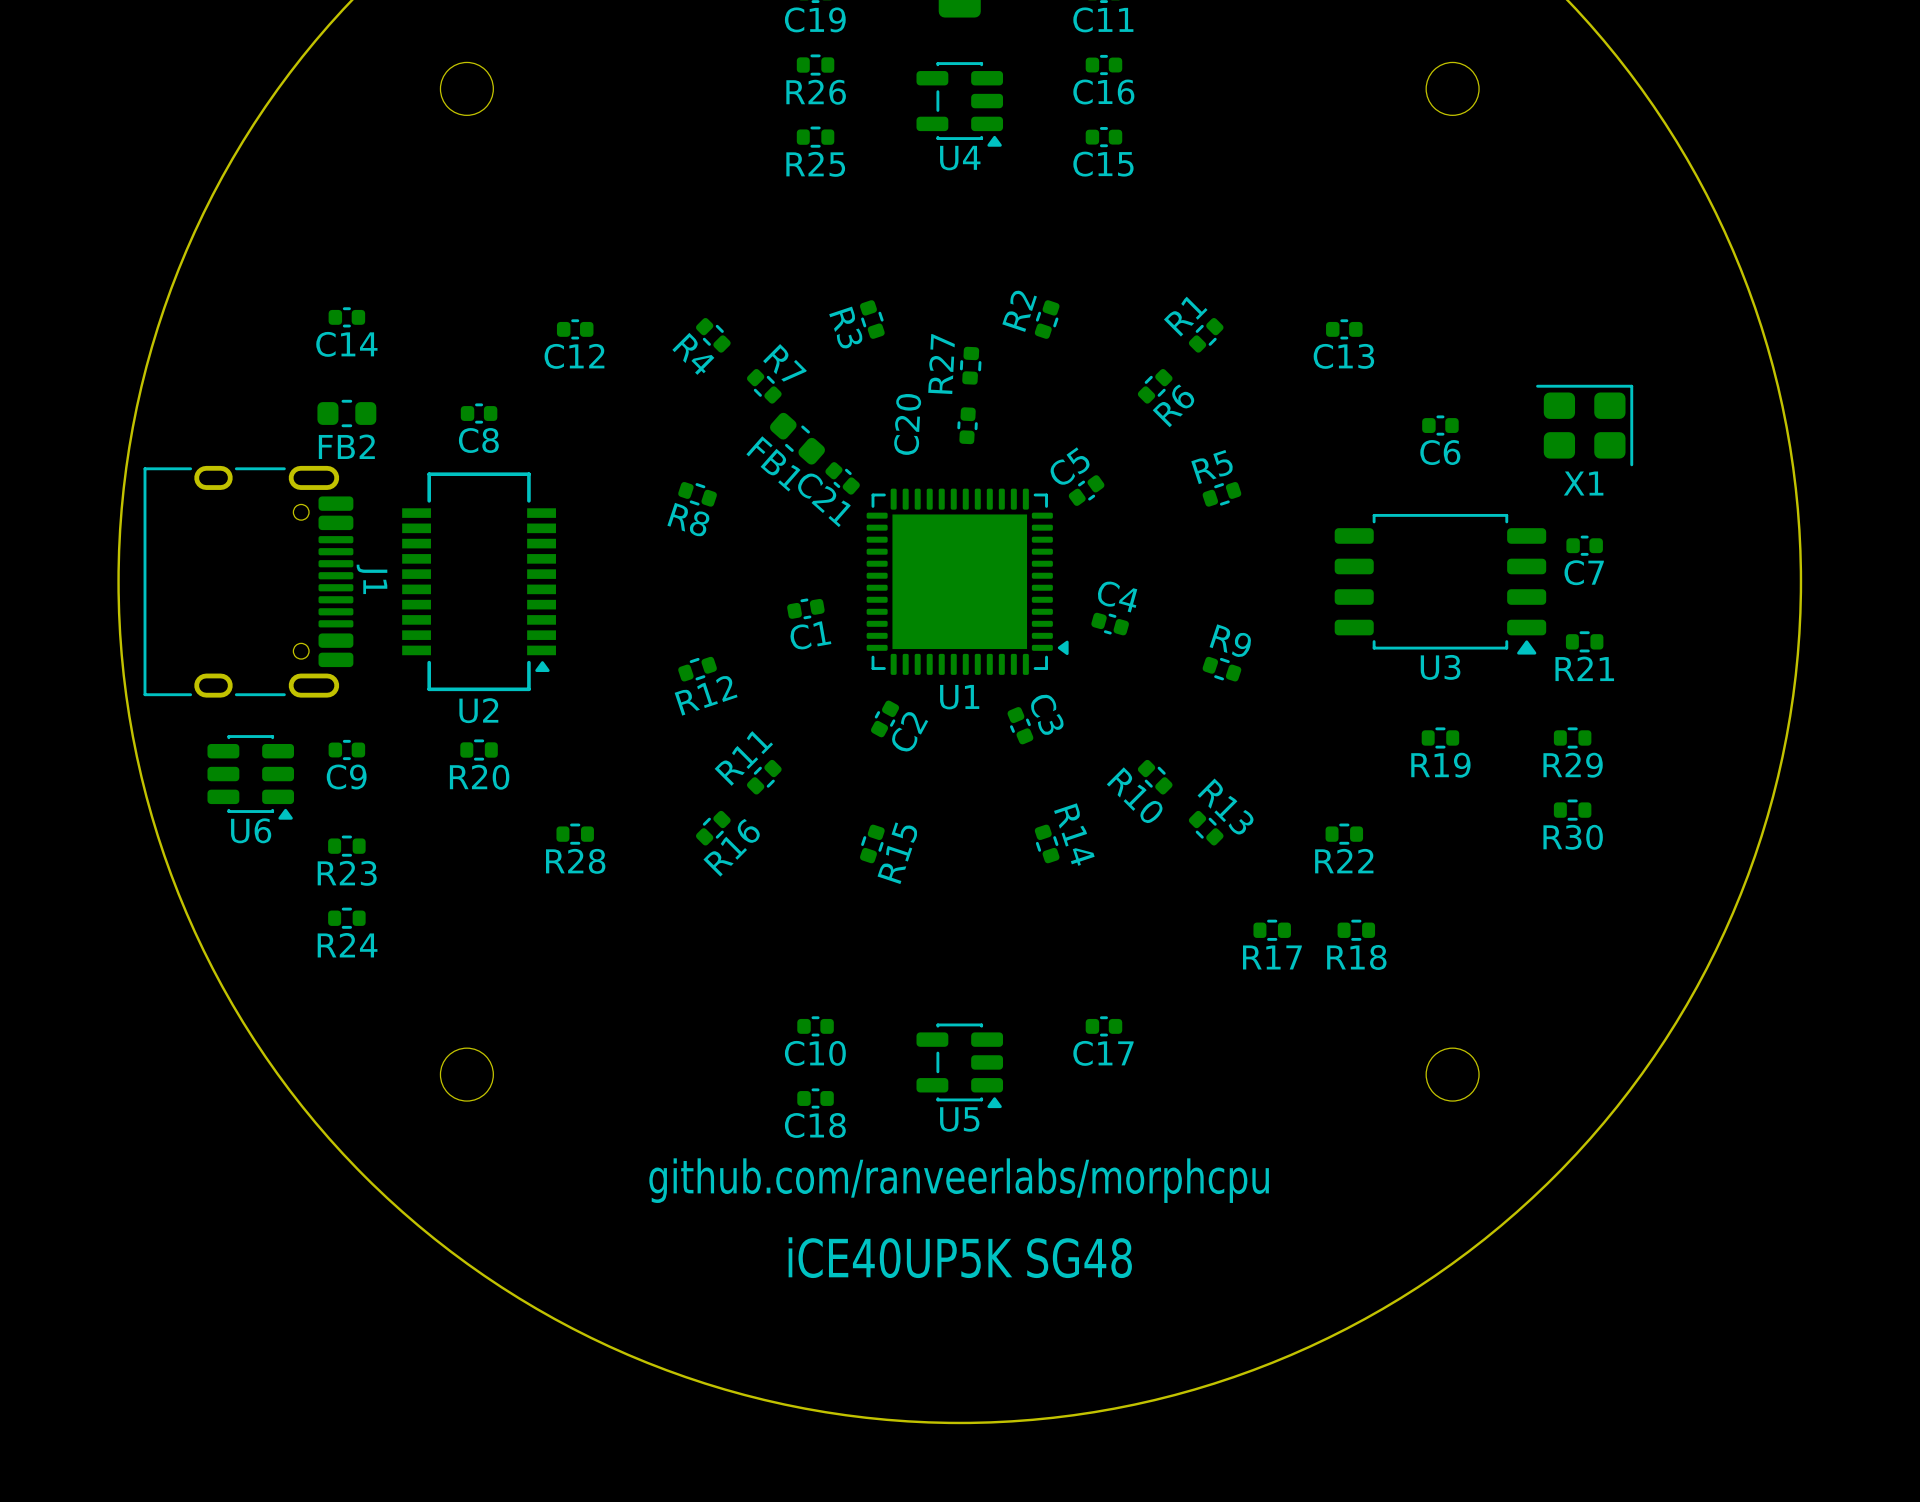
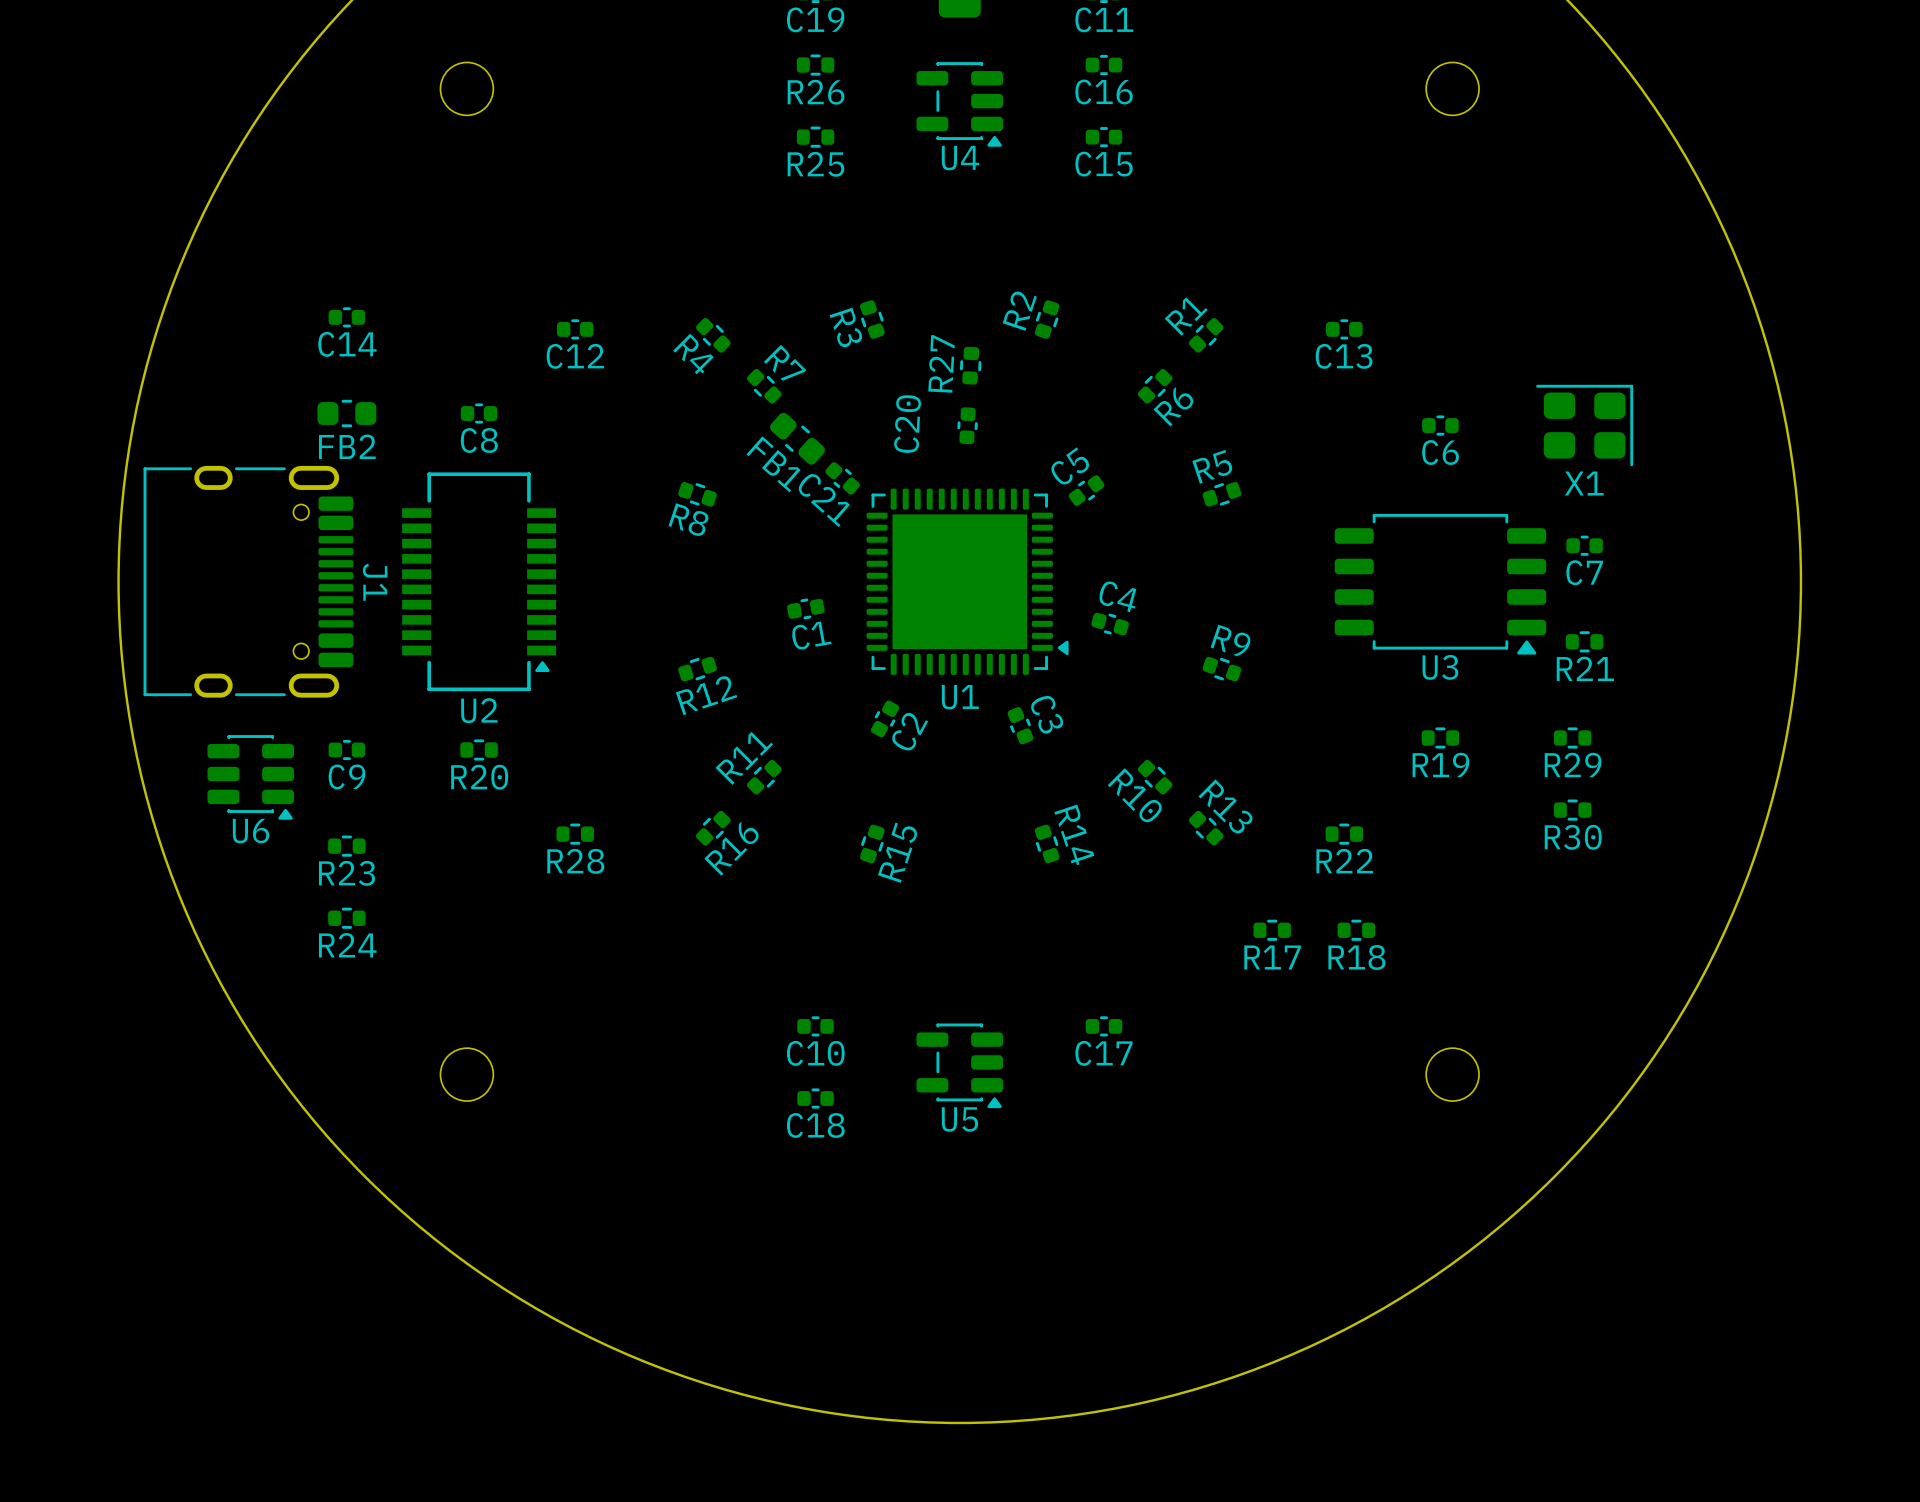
text: github.com/ranveerlabs/morphcpu (959, 1180) -> none
text: iCE40UP5K SG48 (960, 1257) -> none

